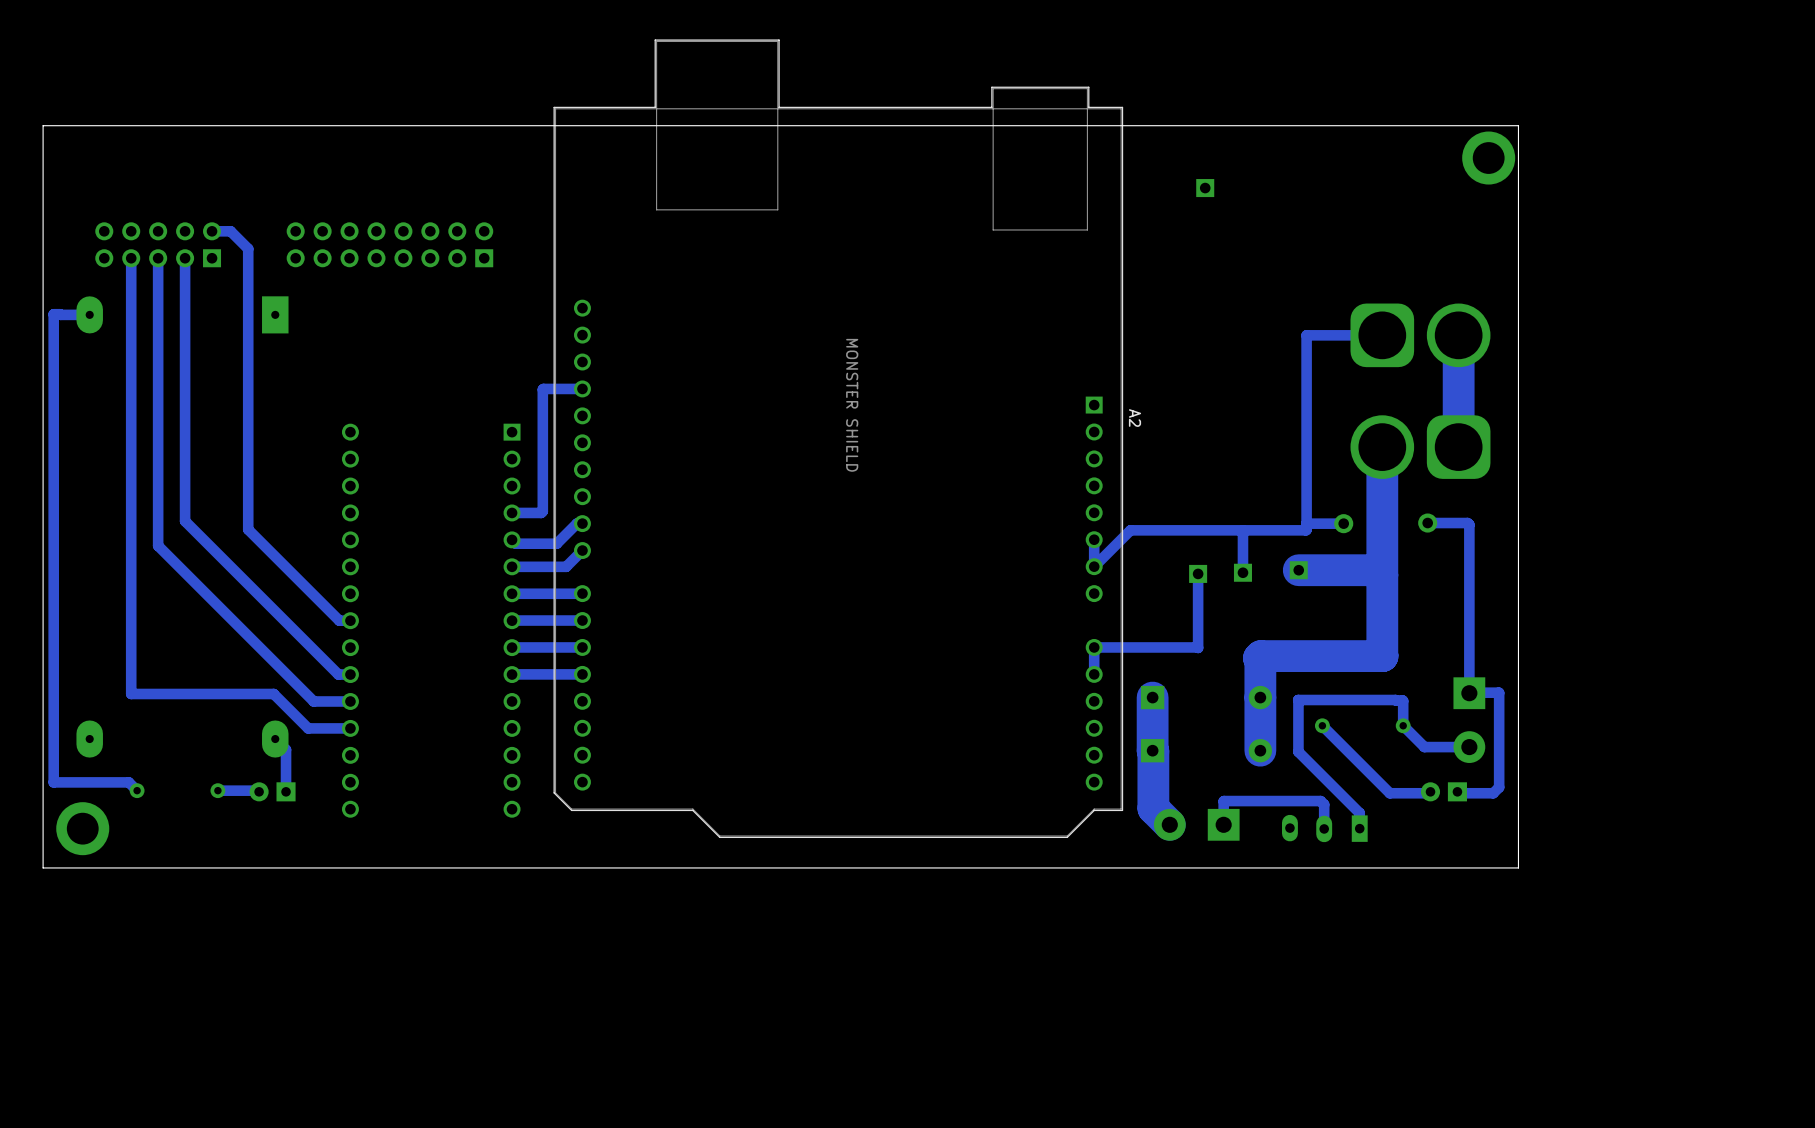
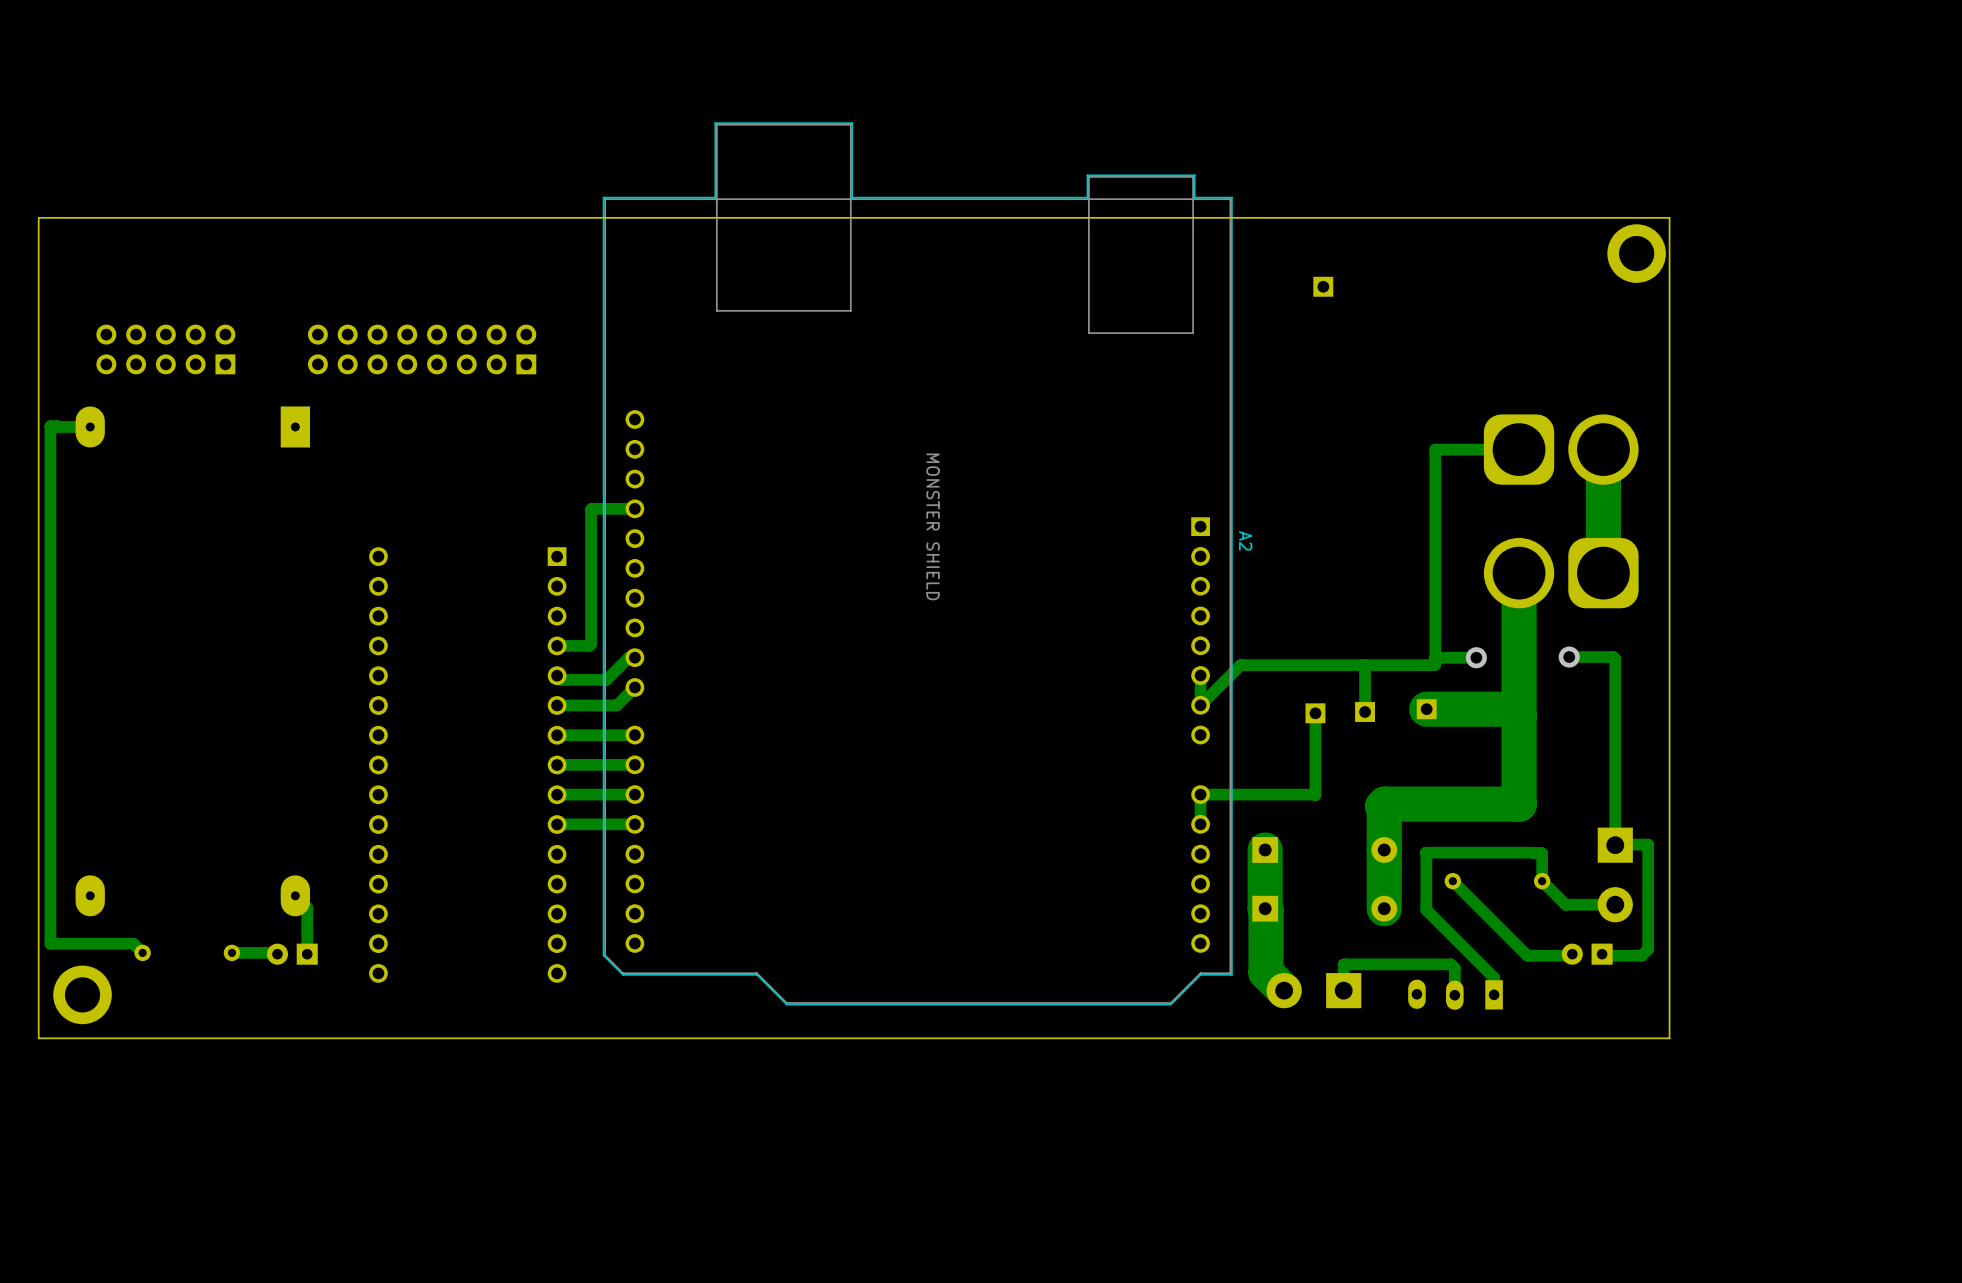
track: (212, 231) (230, 231) (248, 248) (248, 529) (339, 620) (350, 620) -> none
track: (131, 258) (131, 693) (273, 693) (308, 728) (350, 728) -> none
track: (158, 258) (158, 545) (313, 701) (350, 701) -> none
track: (185, 258) (185, 521) (338, 674) (350, 674) -> none

